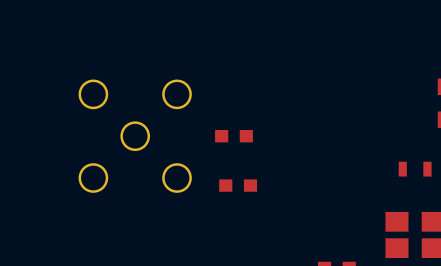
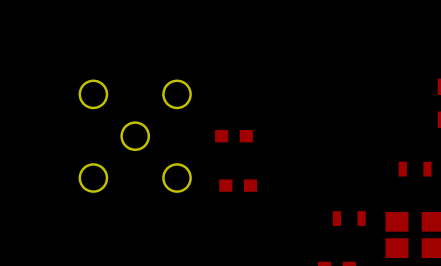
part: none -> (349, 218)

